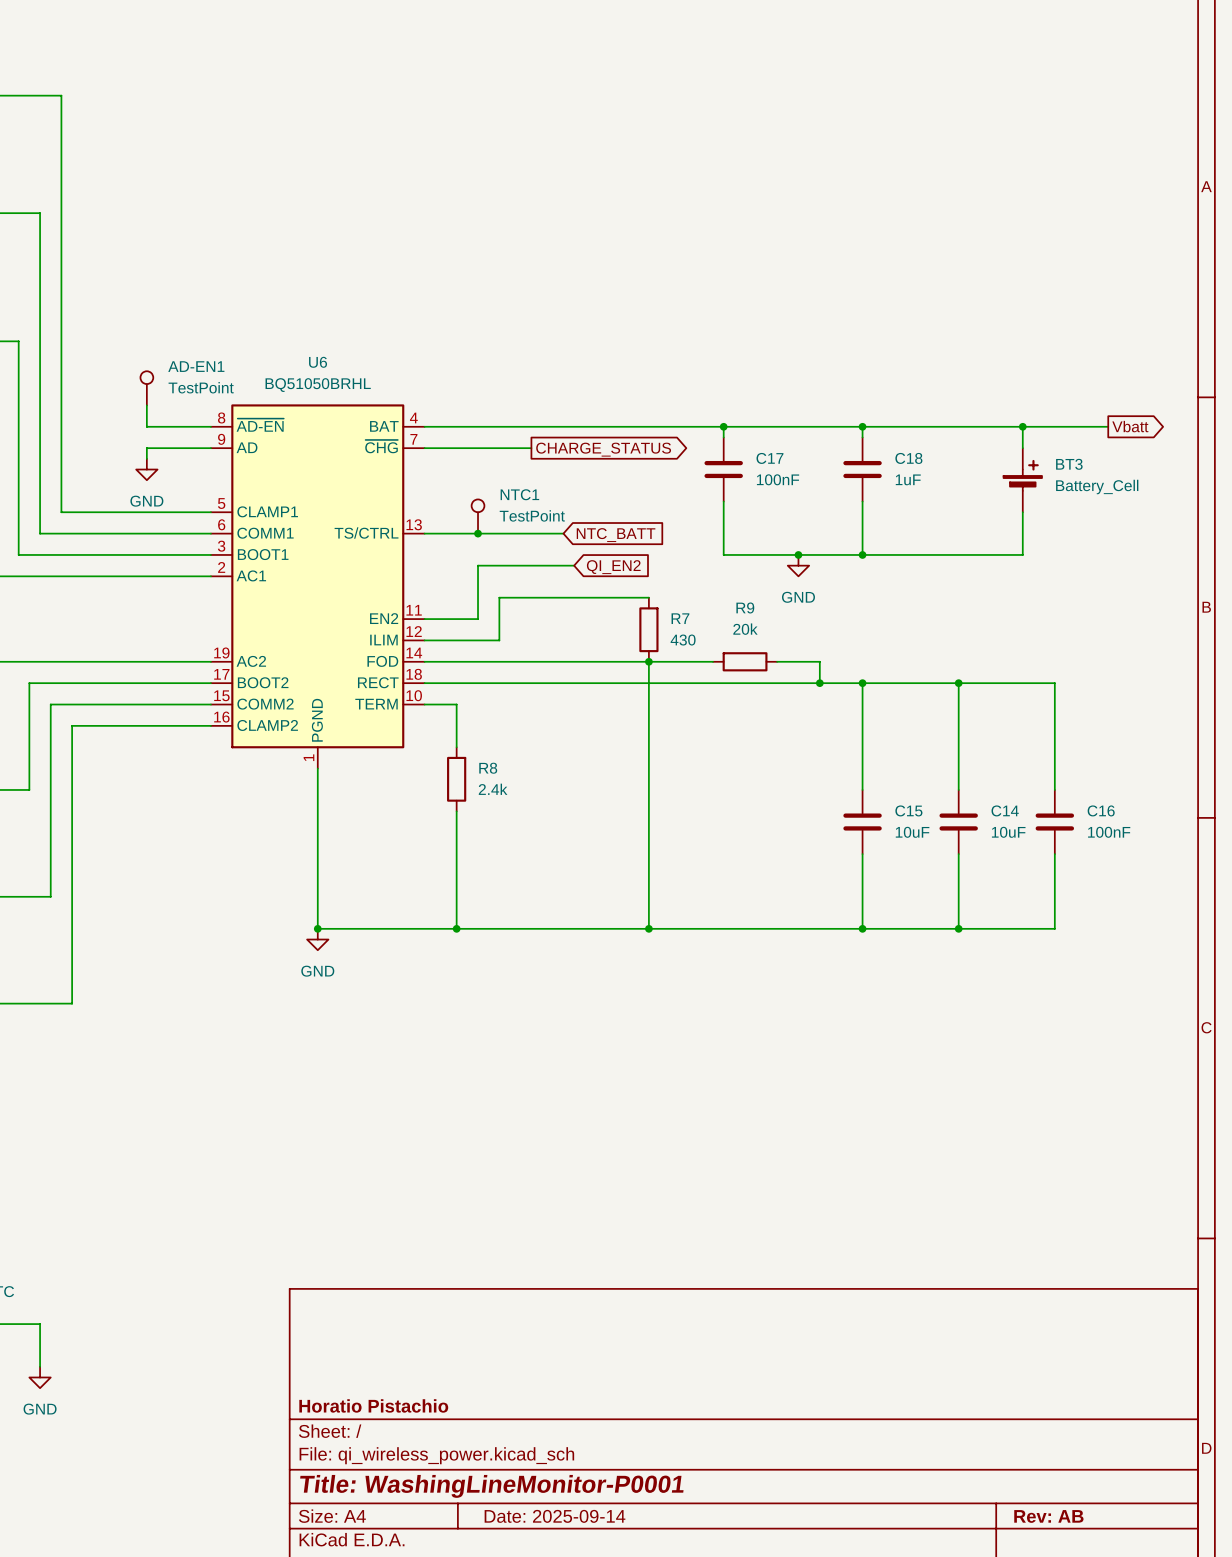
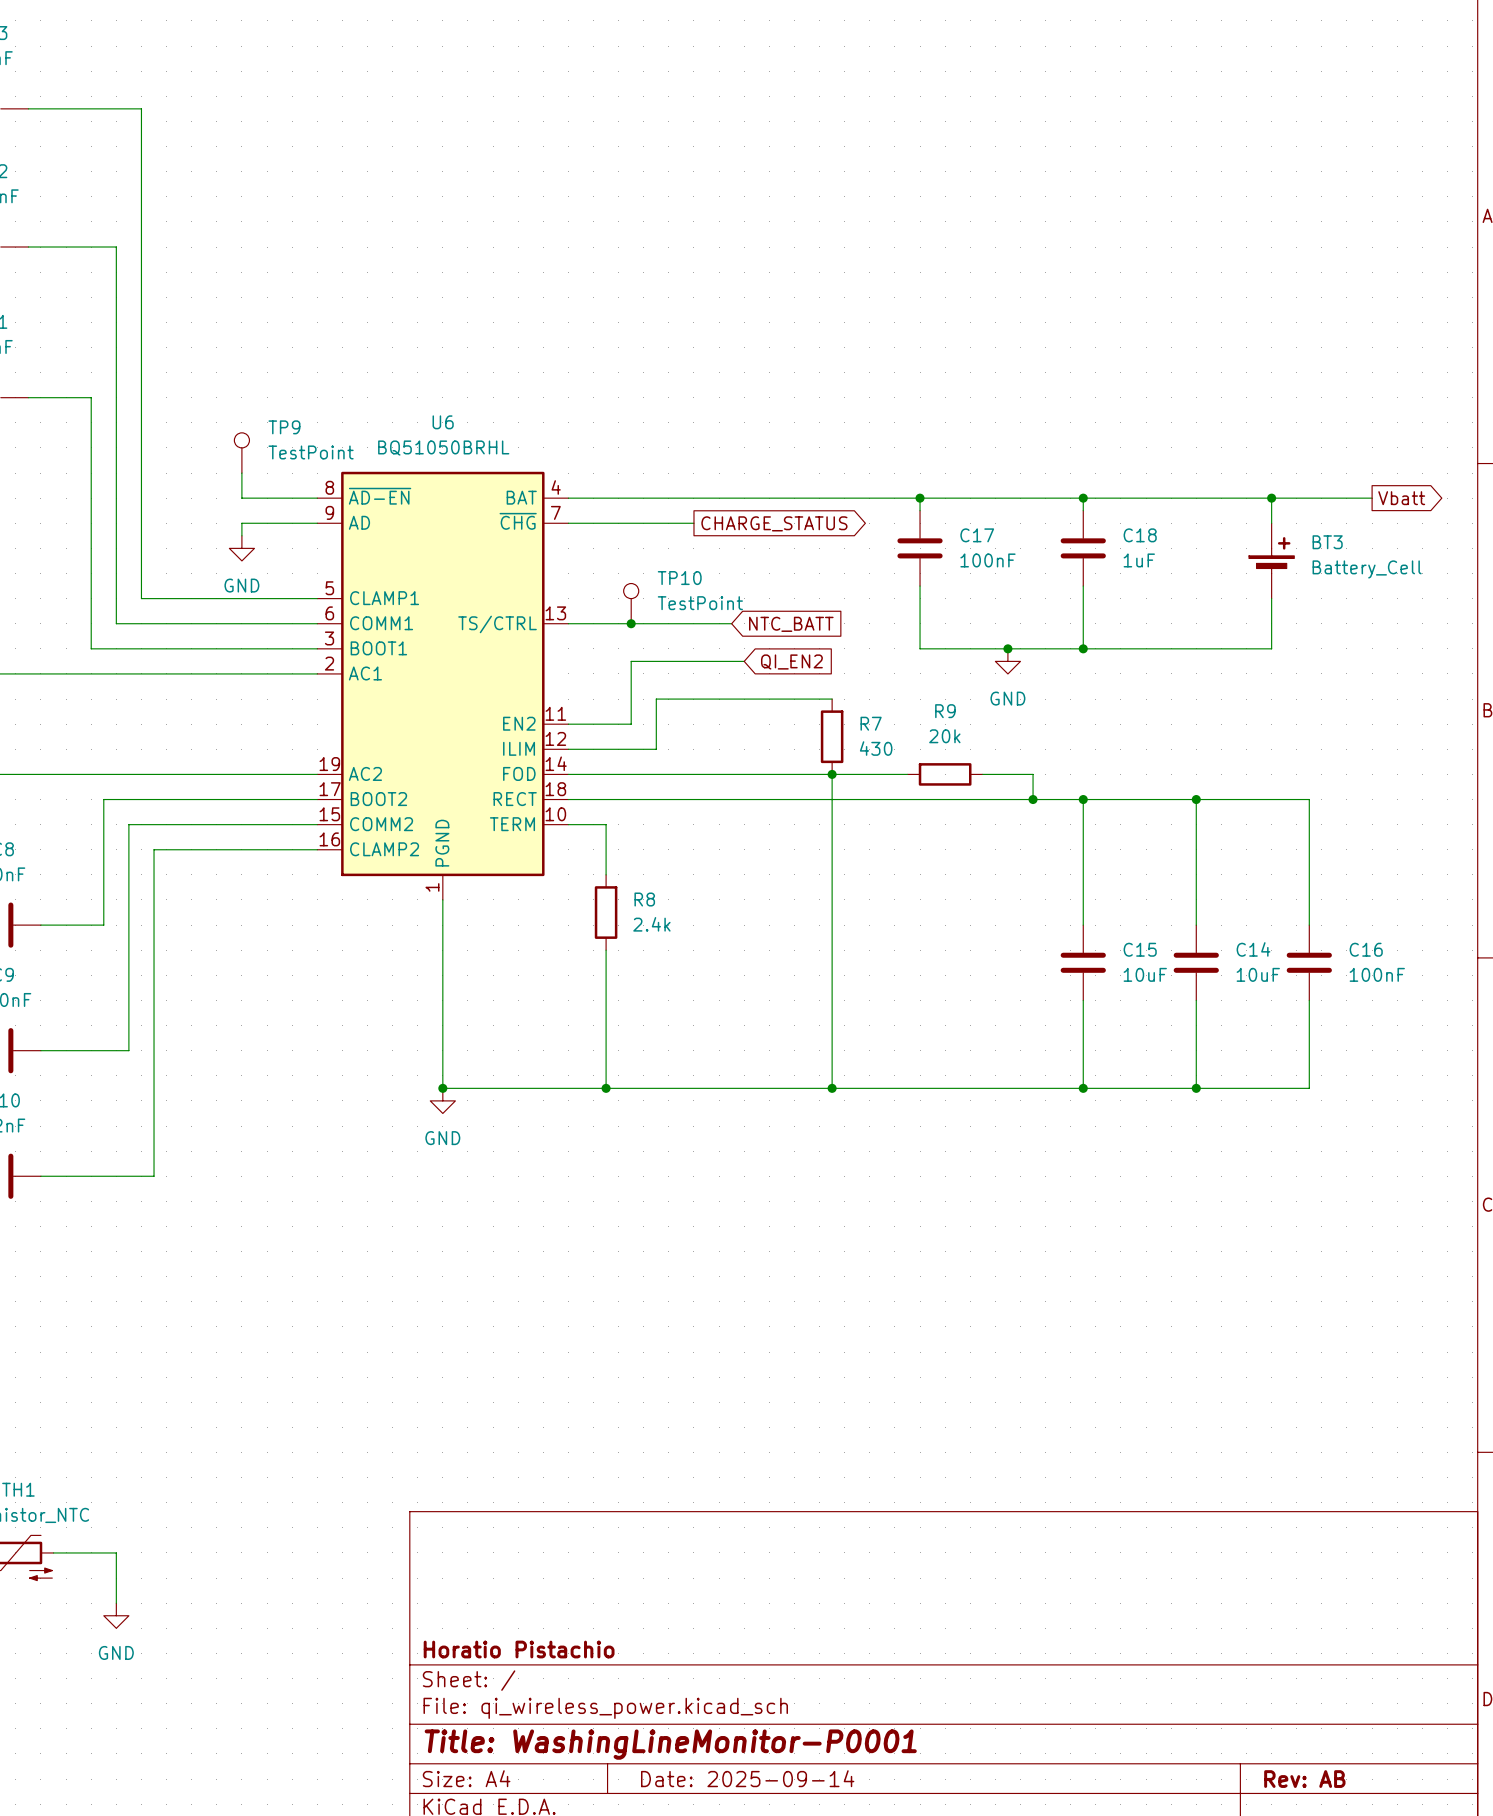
AD-EN1 name: AD-EN1 (196, 366) -> TP9 (284, 427)
NTC1 name: NTC1 (519, 494) -> TP10 (679, 578)

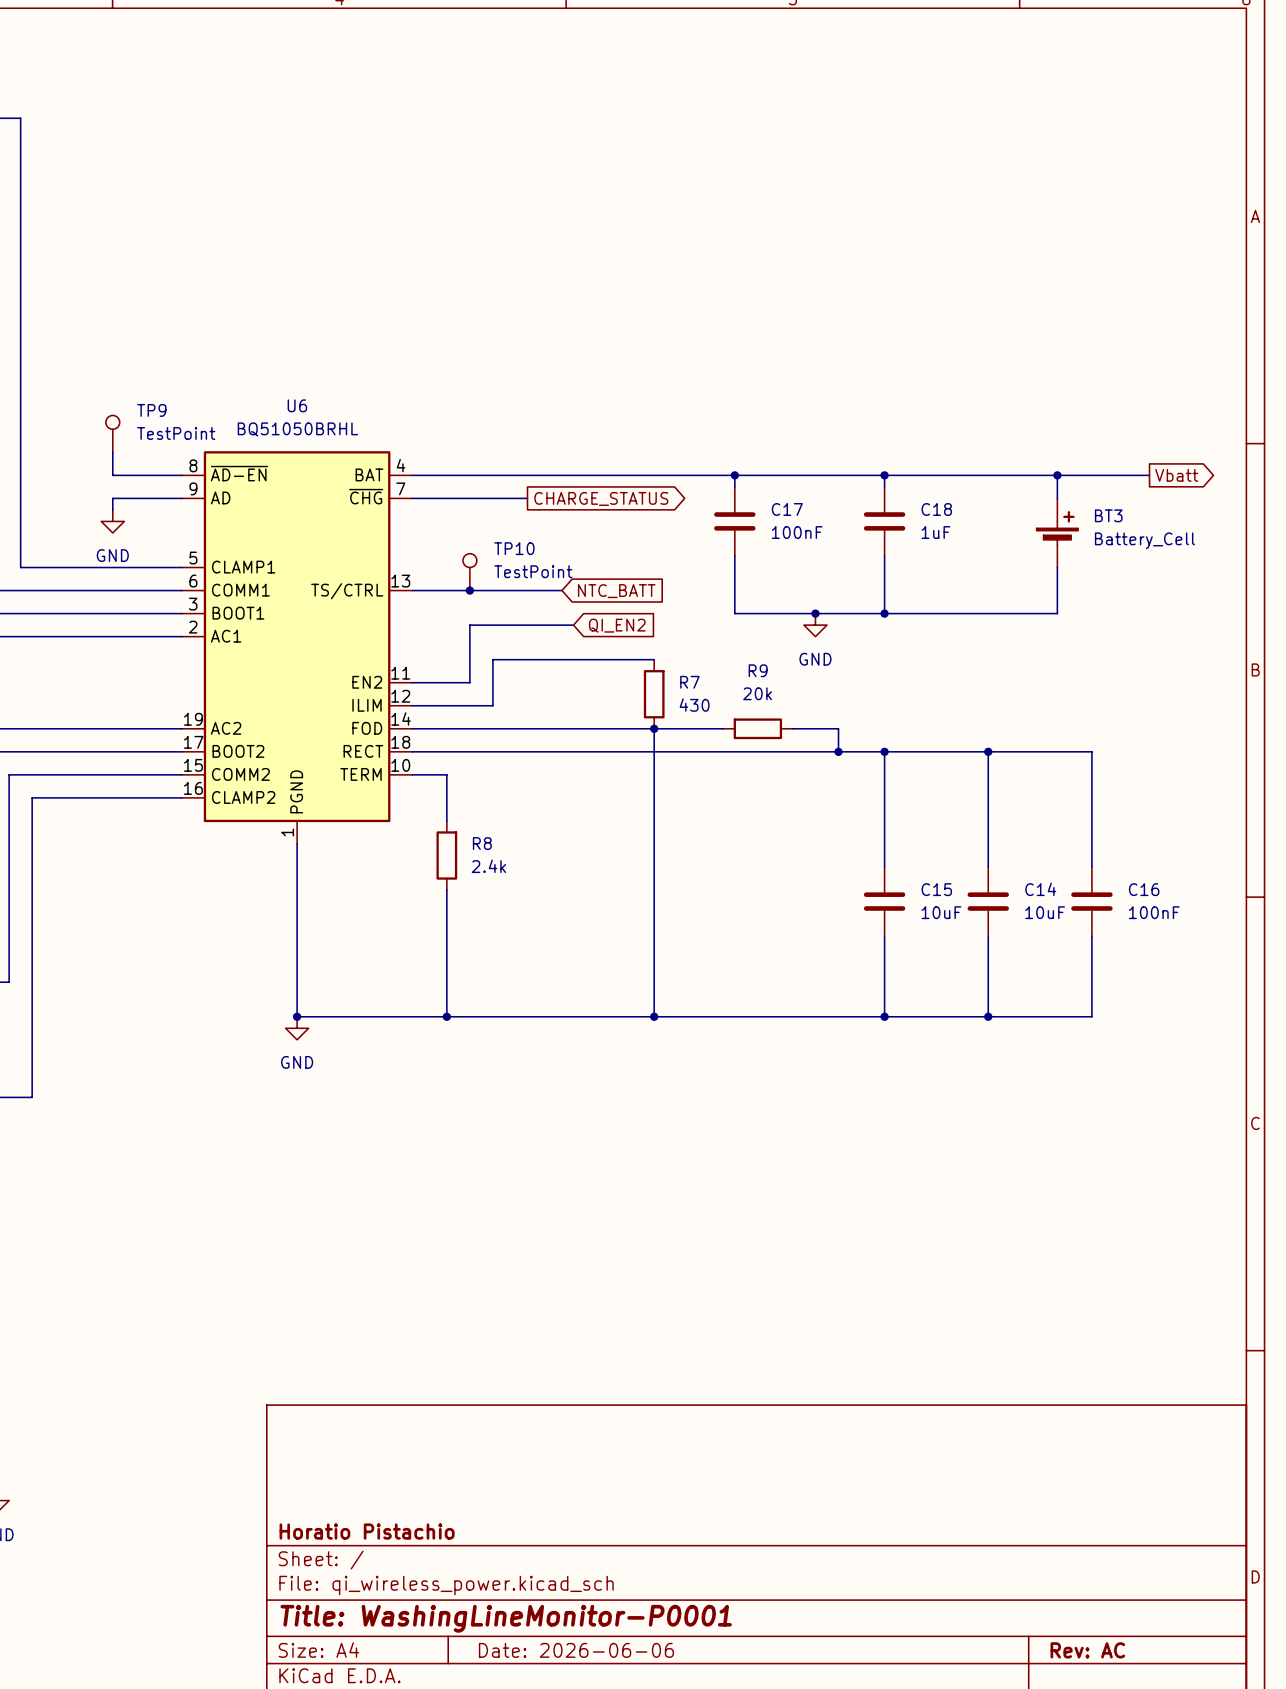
title block: Date: 2025-09-14 (747, 1778) -> Date: 2026-06-06 (576, 1650)
title block: Rev: AB (1304, 1779) -> Rev: AC (1087, 1650)

